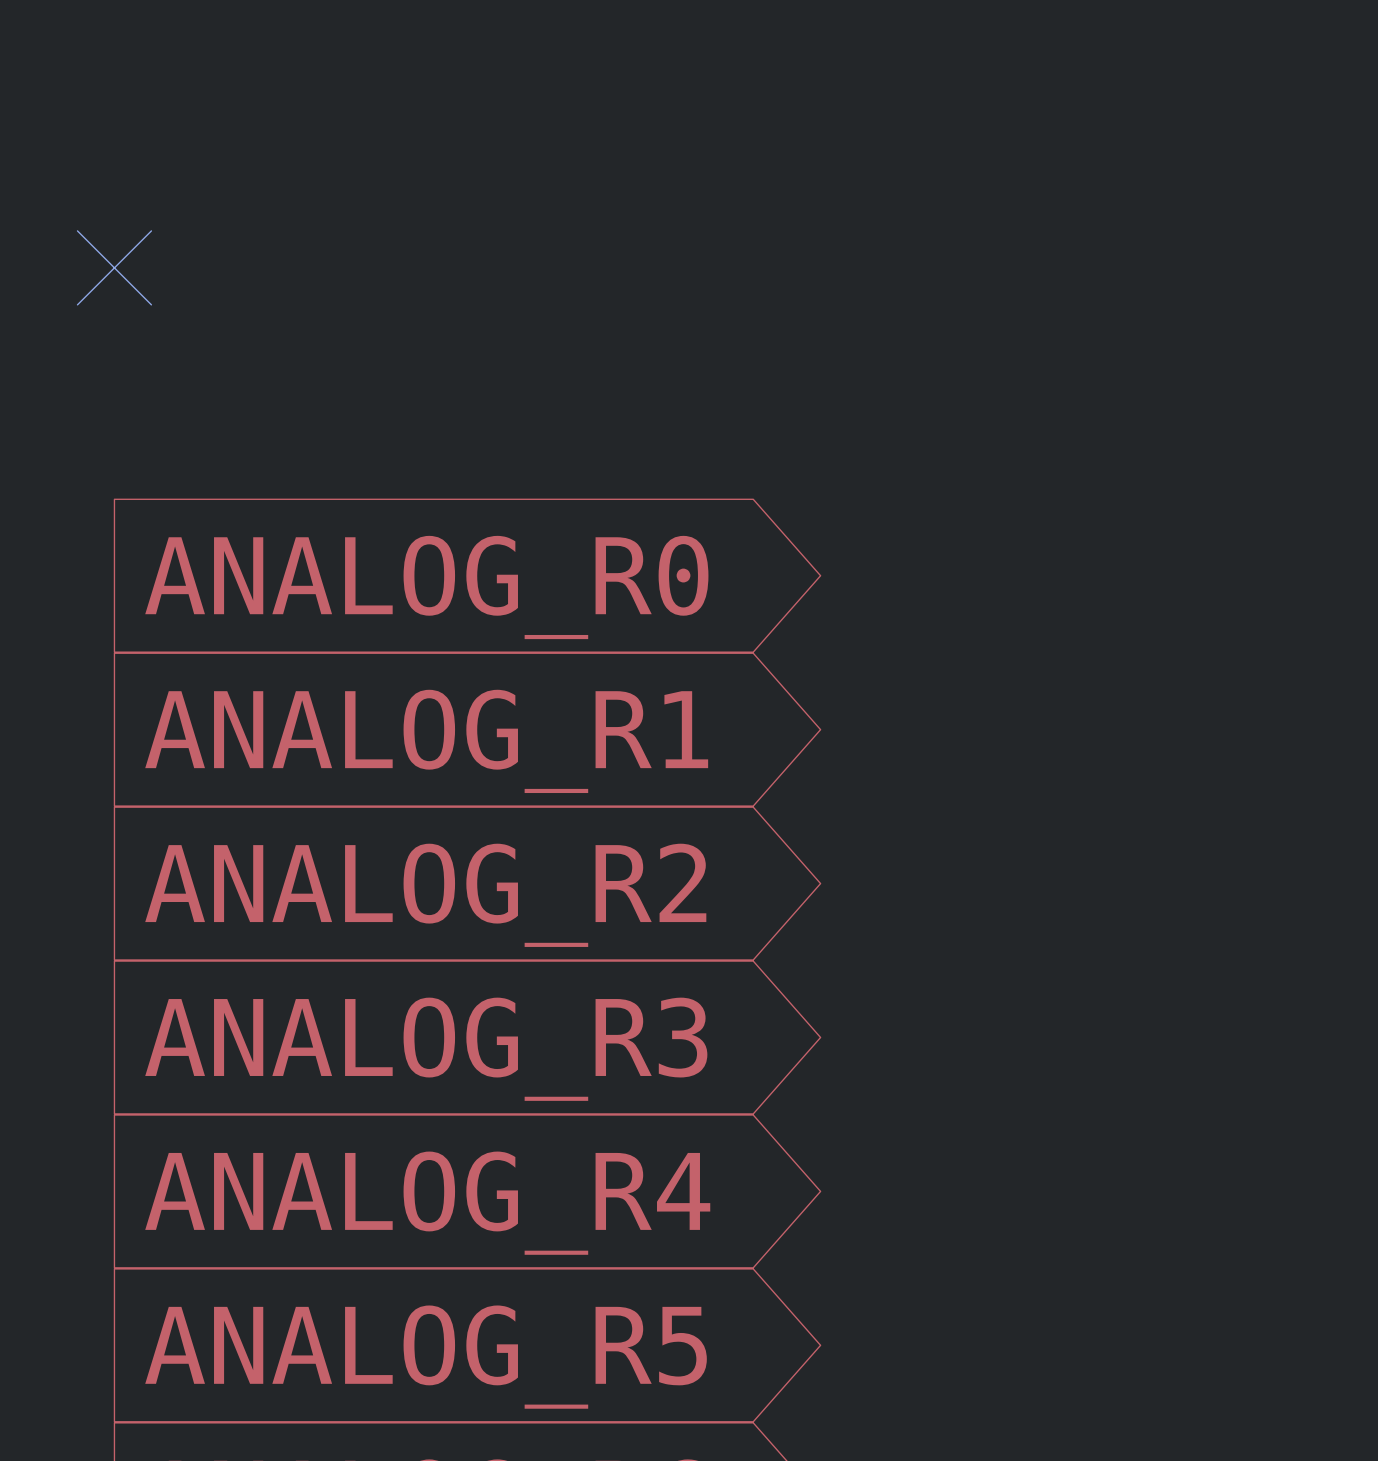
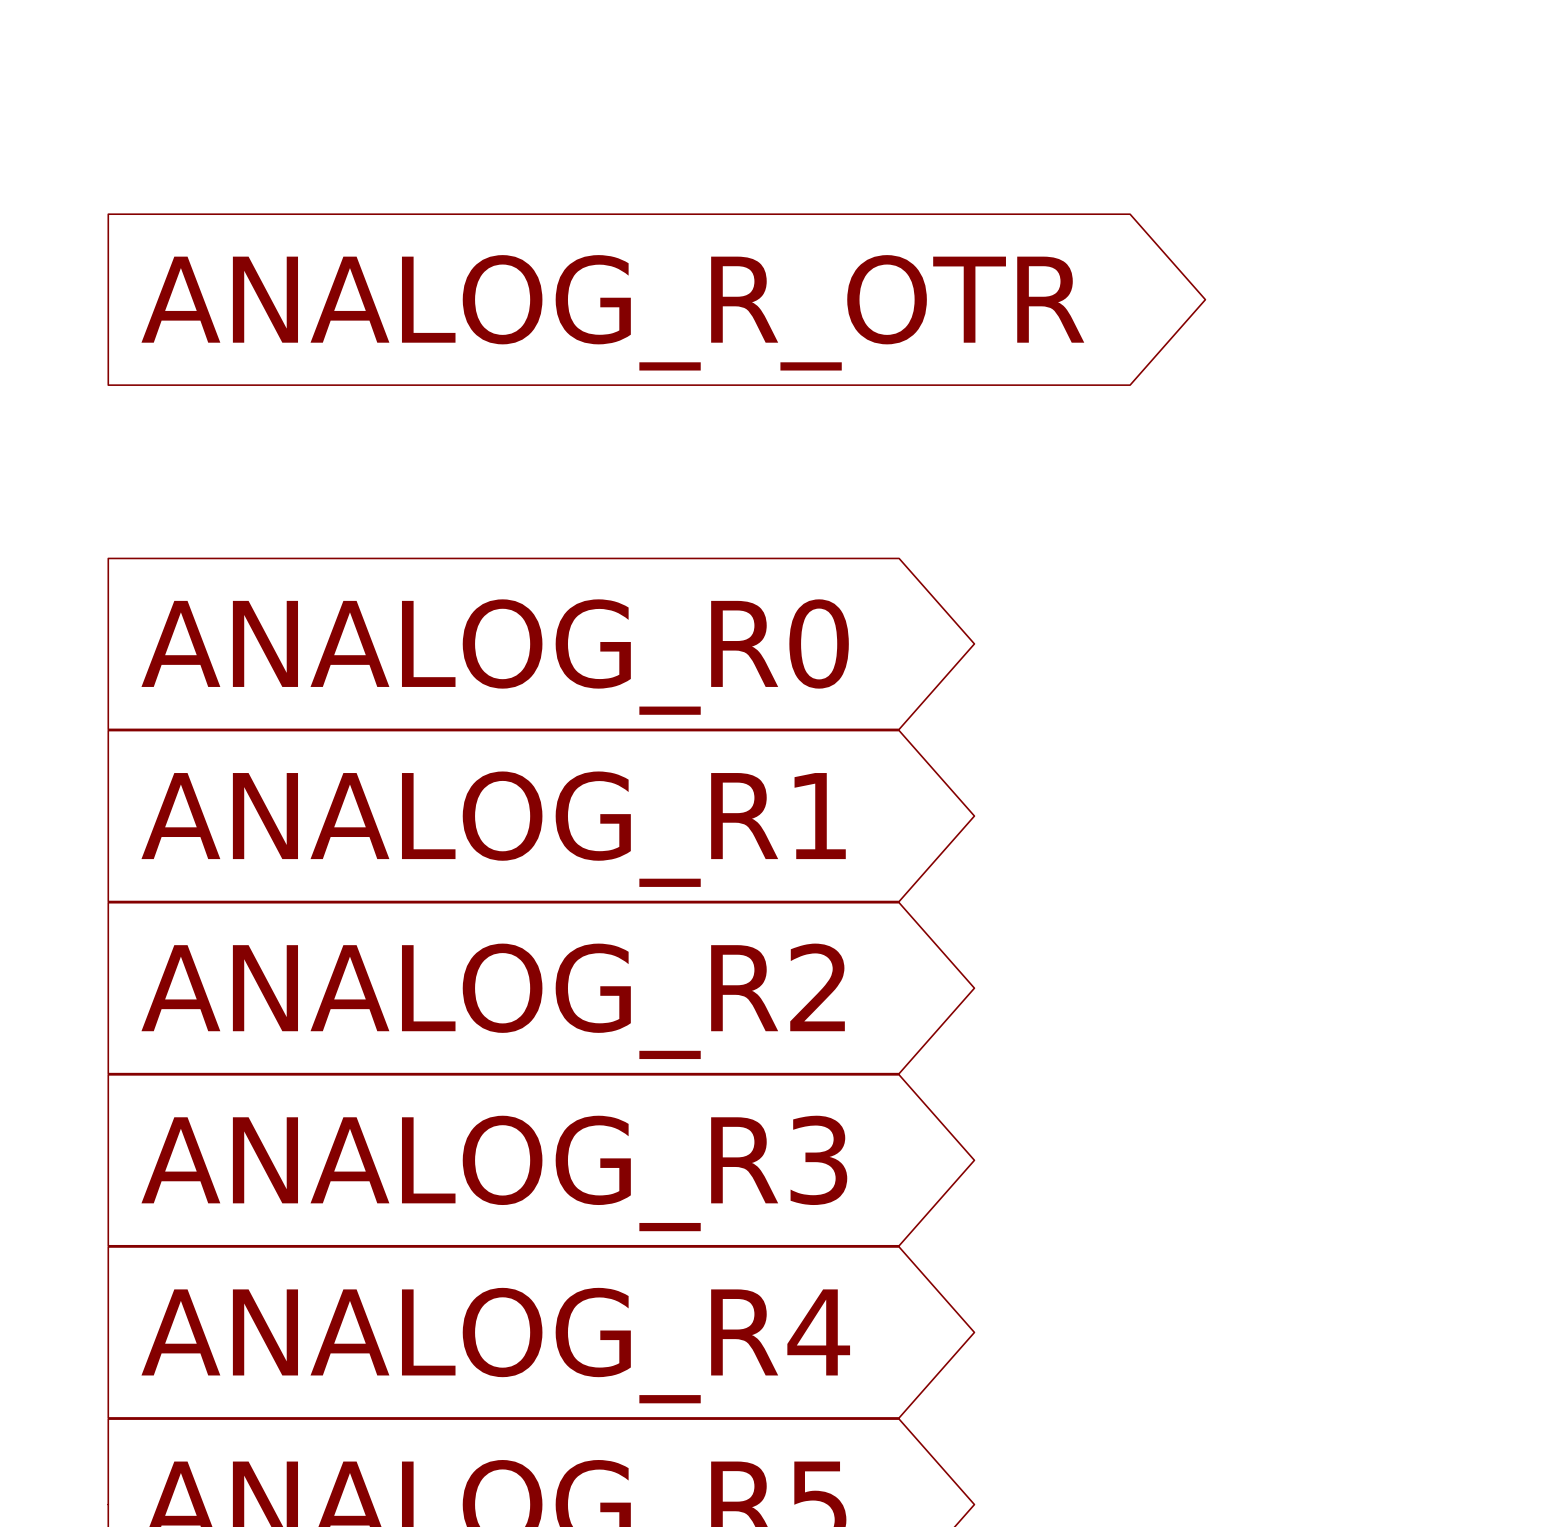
no-connect mark: (114, 267) -> none
global label: none -> ANALOG_R_OTR (612, 312)

